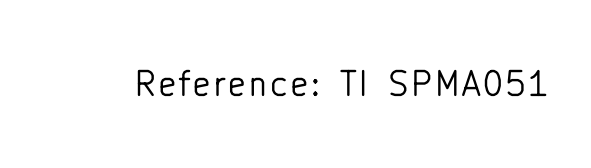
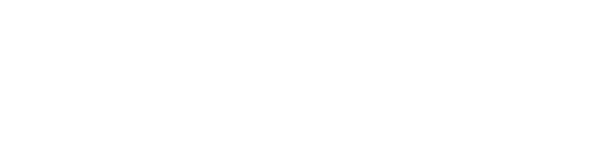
text: Reference: TI SPMA051 (342, 82) -> none

